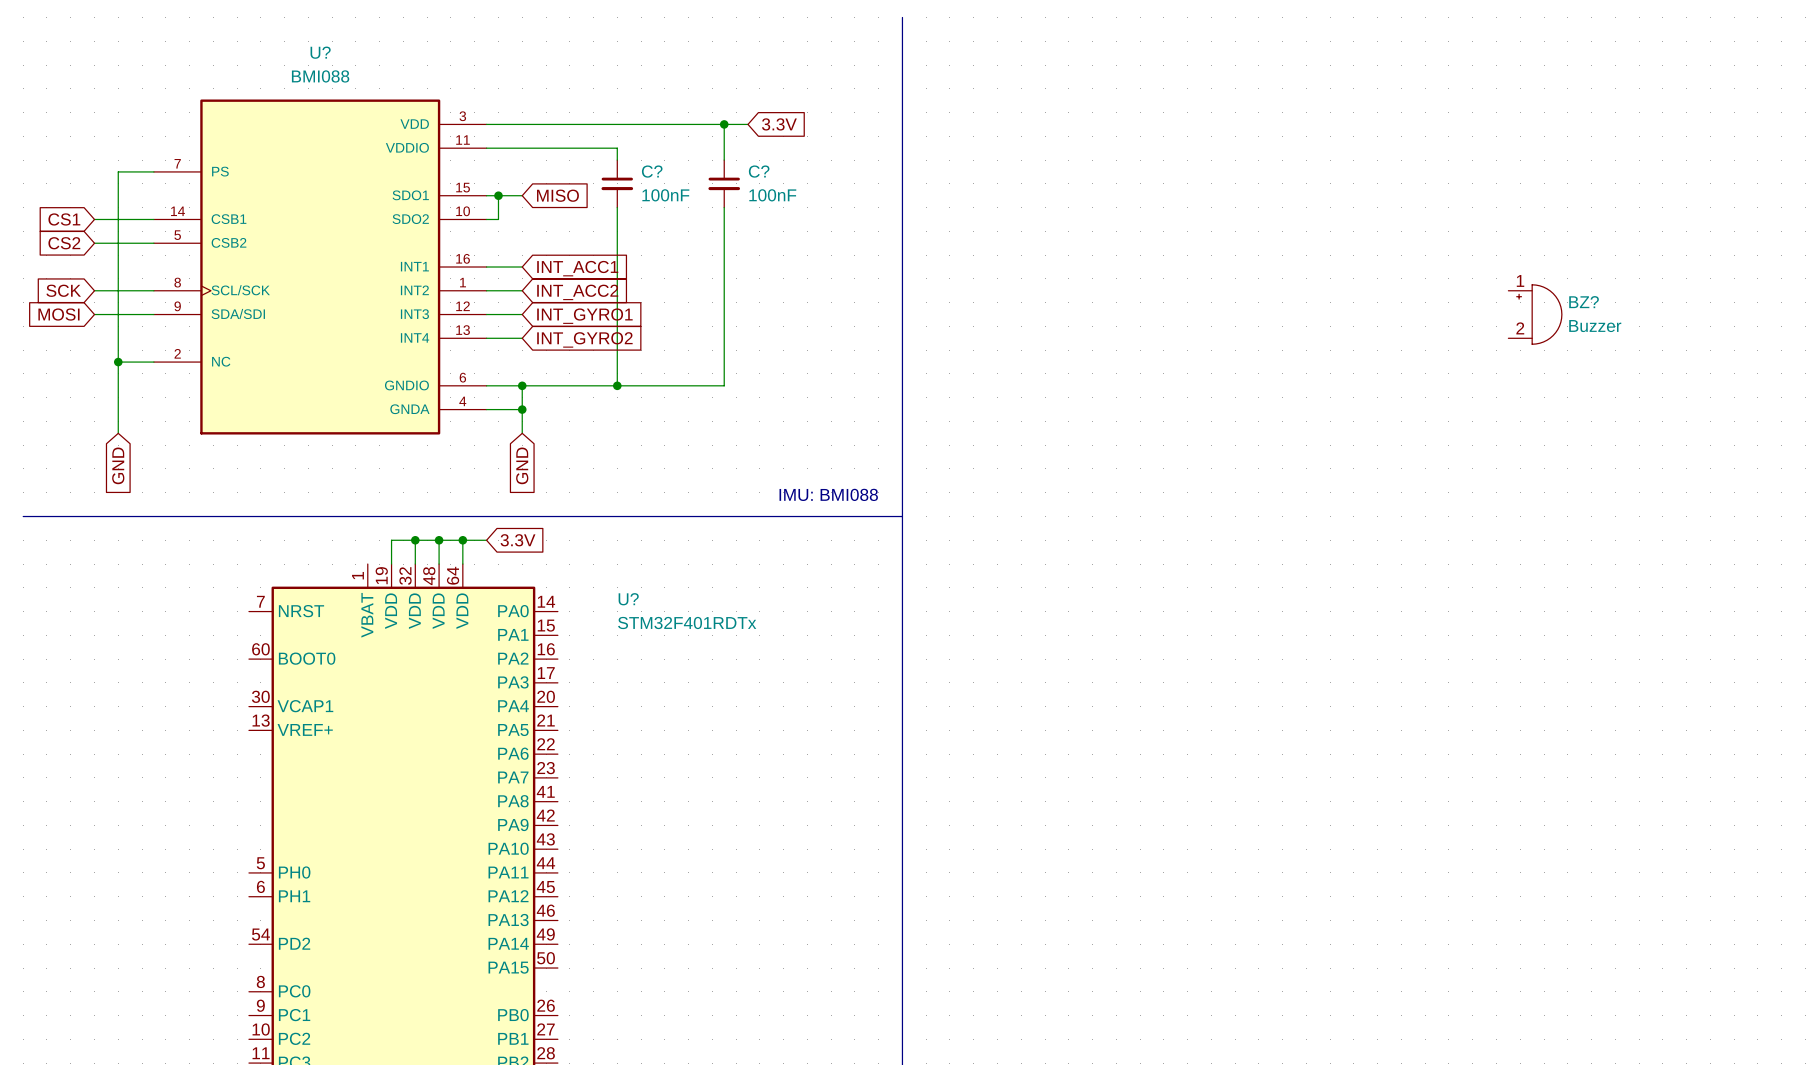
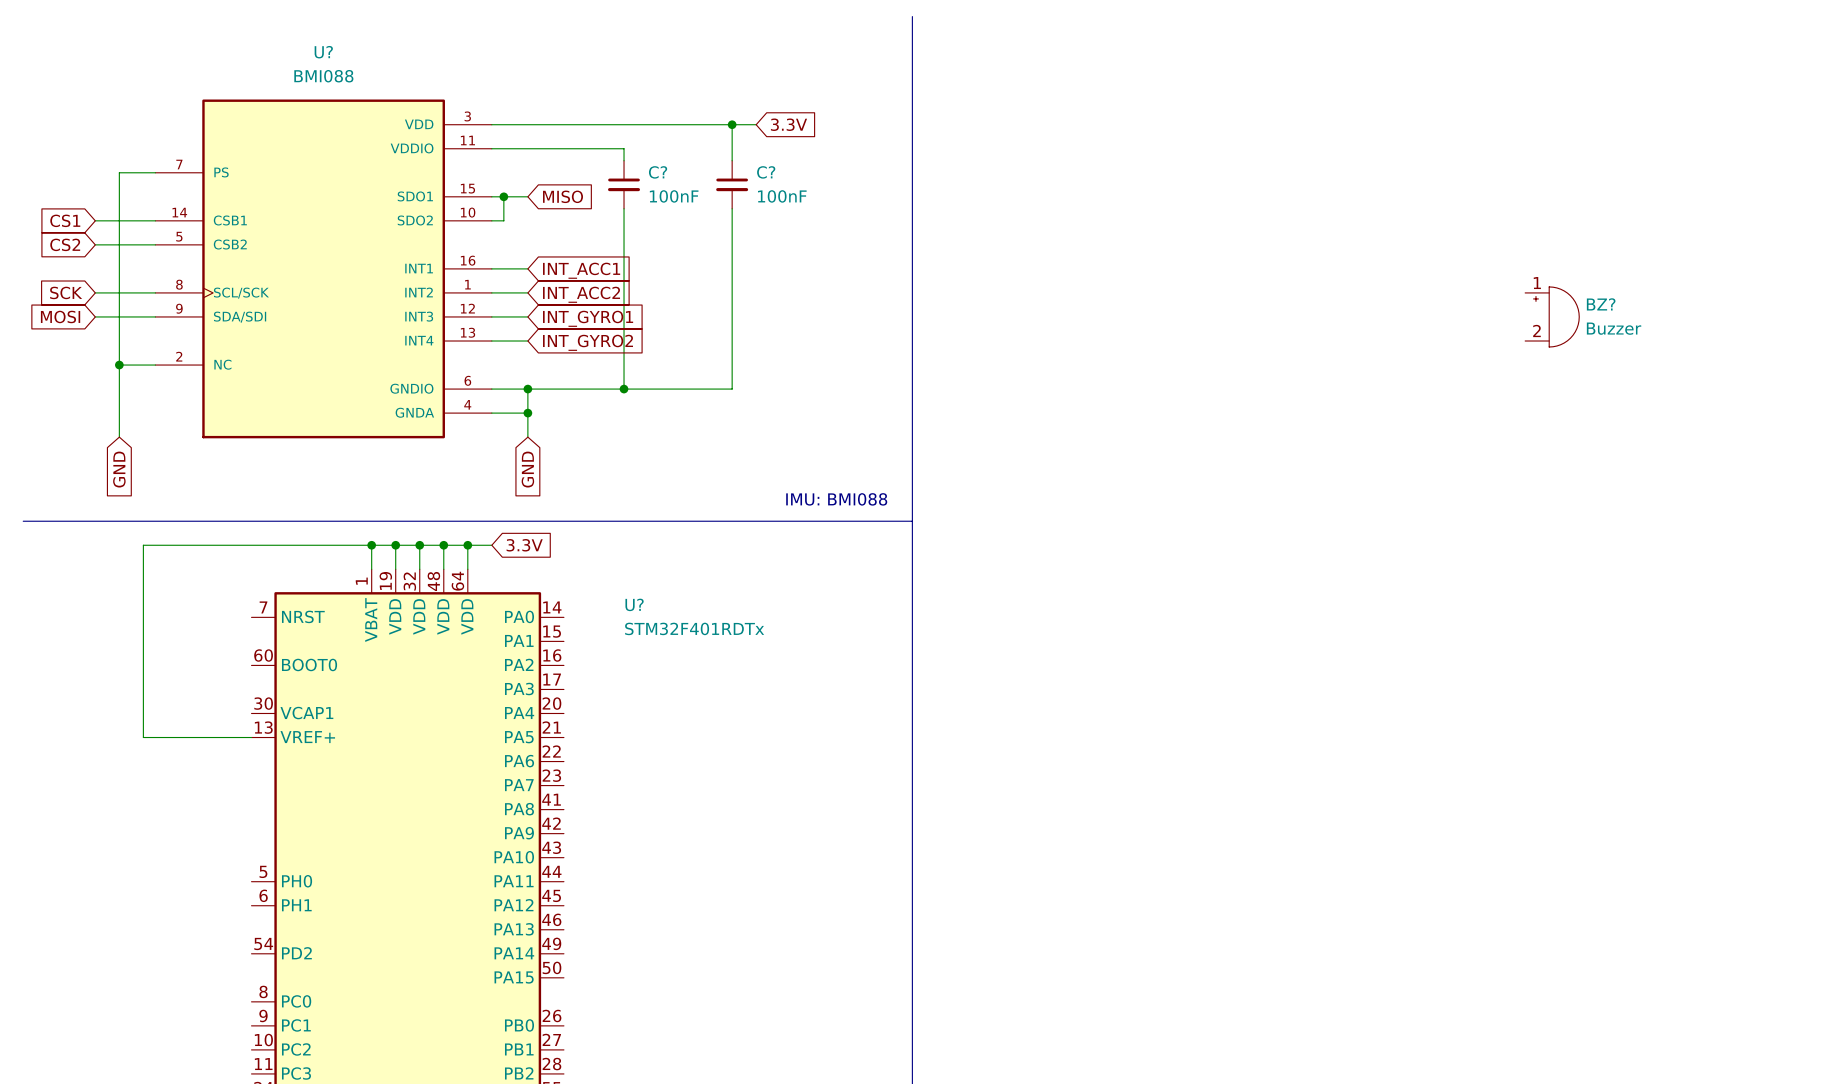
wire: none -> (371, 545) (371, 569)
junction: none -> (371, 545)
wire: none -> (395, 545) (143, 545) (143, 737) (251, 737)
junction: none -> (395, 545)

